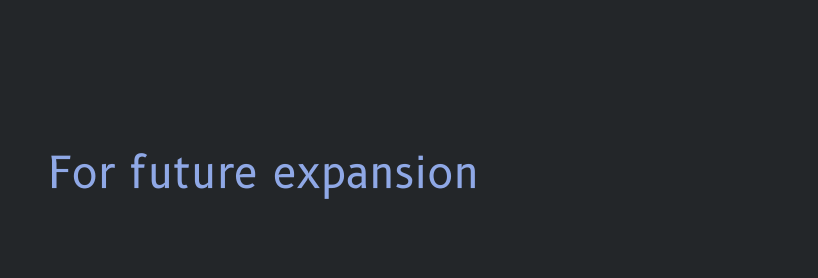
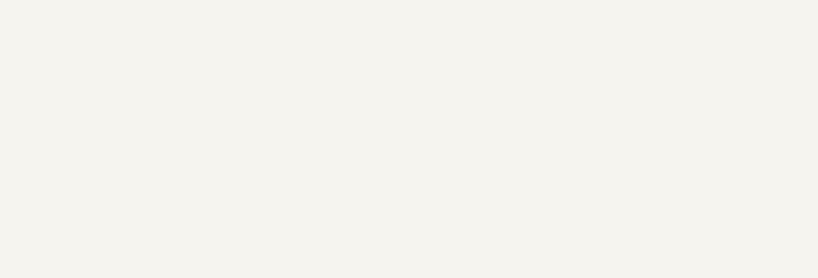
text: For future expansion (263, 176) -> none

